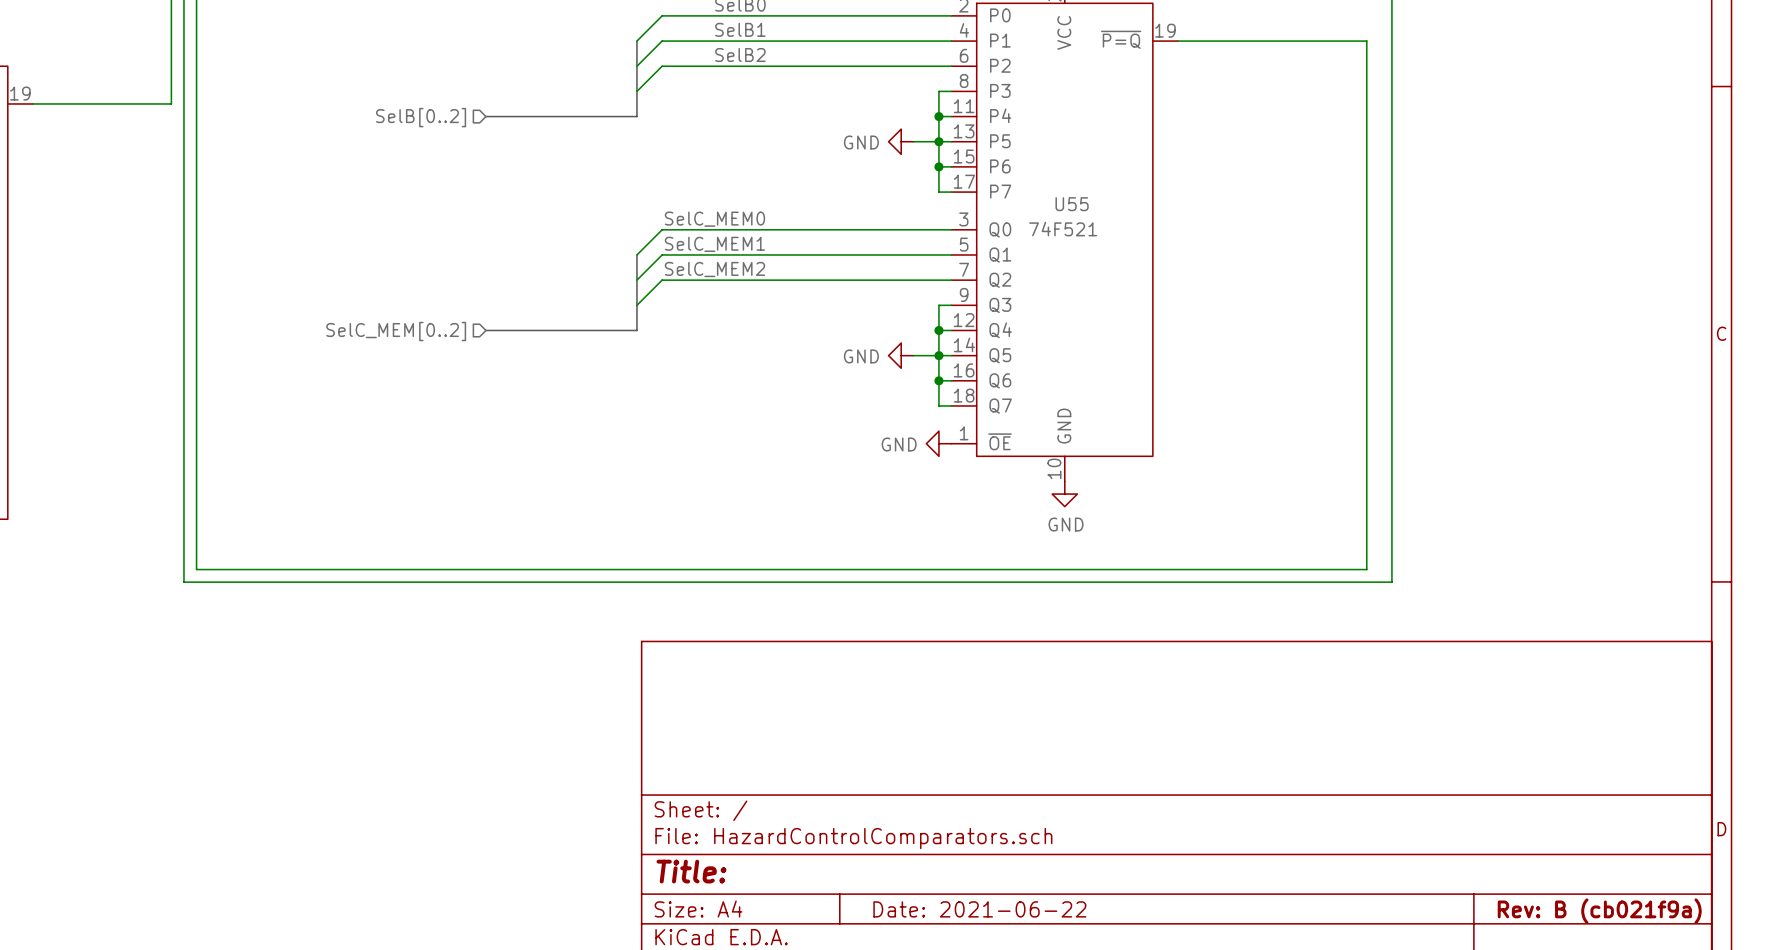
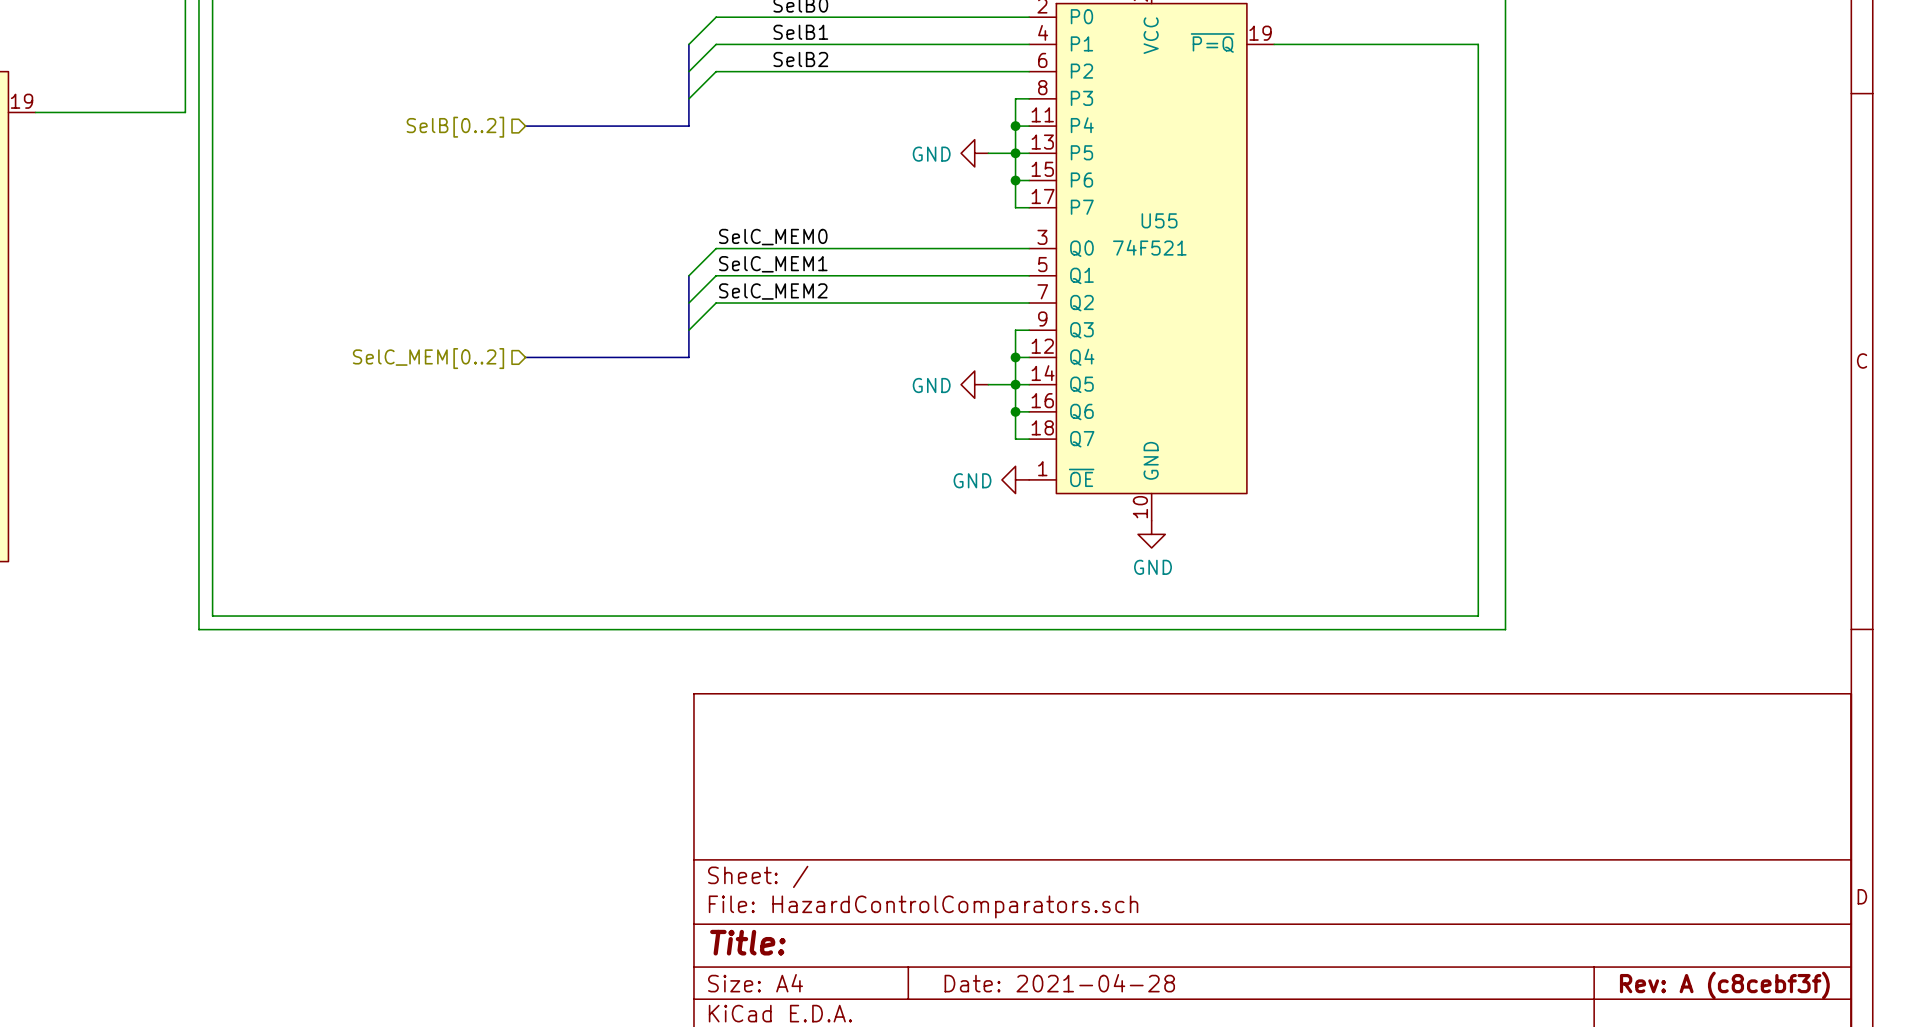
title block: Date: 2021-06-22 (979, 909) -> Date: 2021-04-28 (1059, 983)
title block: Rev: B (cb021f9a) (1599, 911) -> Rev: A (c8cebf3f) (1724, 985)

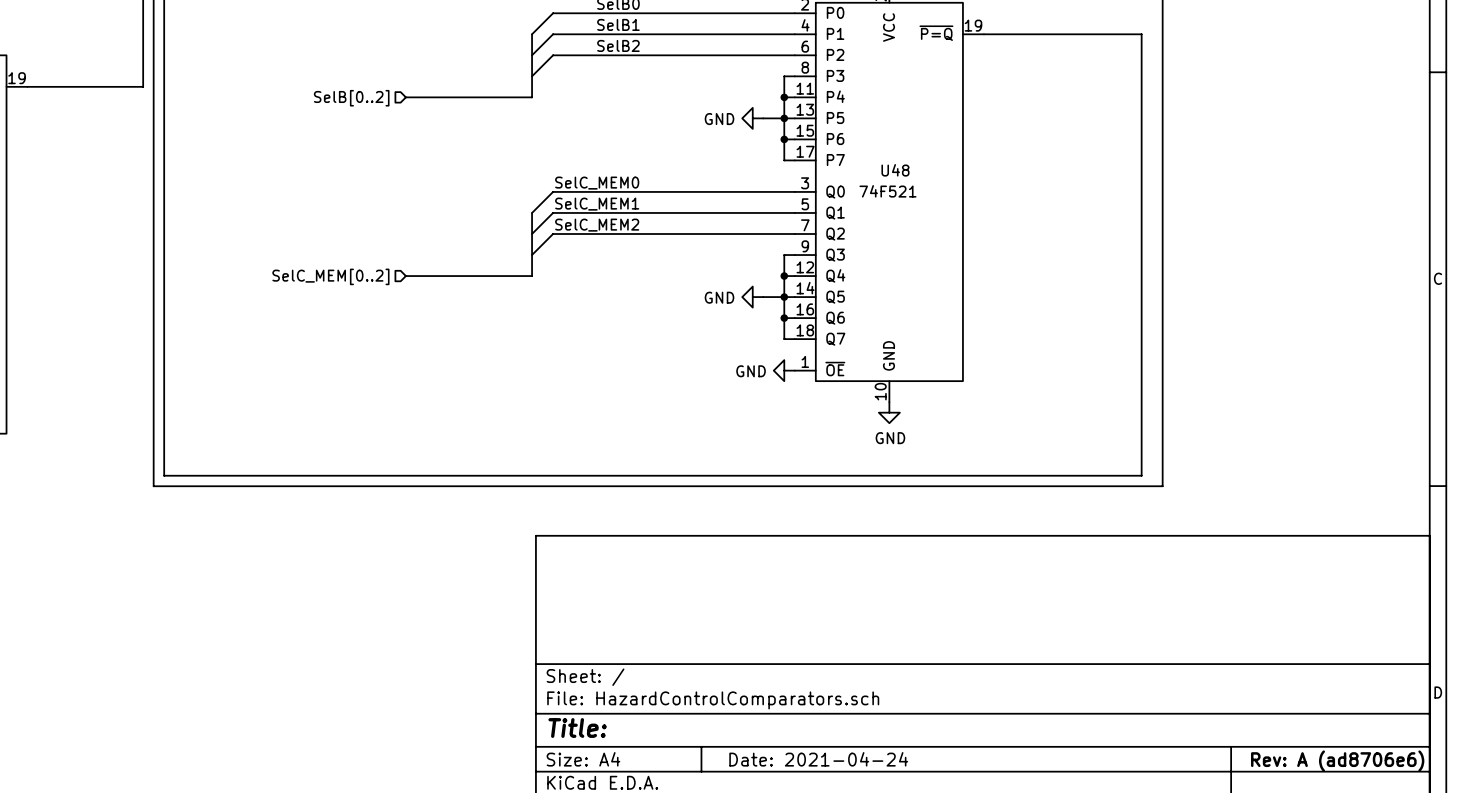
U55 name: U55 (1159, 220) -> U48 (895, 170)
title block: Date: 2021-04-28 (1059, 983) -> Date: 2021-04-24 (818, 759)
title block: Rev: A (c8cebf3f) (1724, 985) -> Rev: A (ad8706e6) (1337, 761)

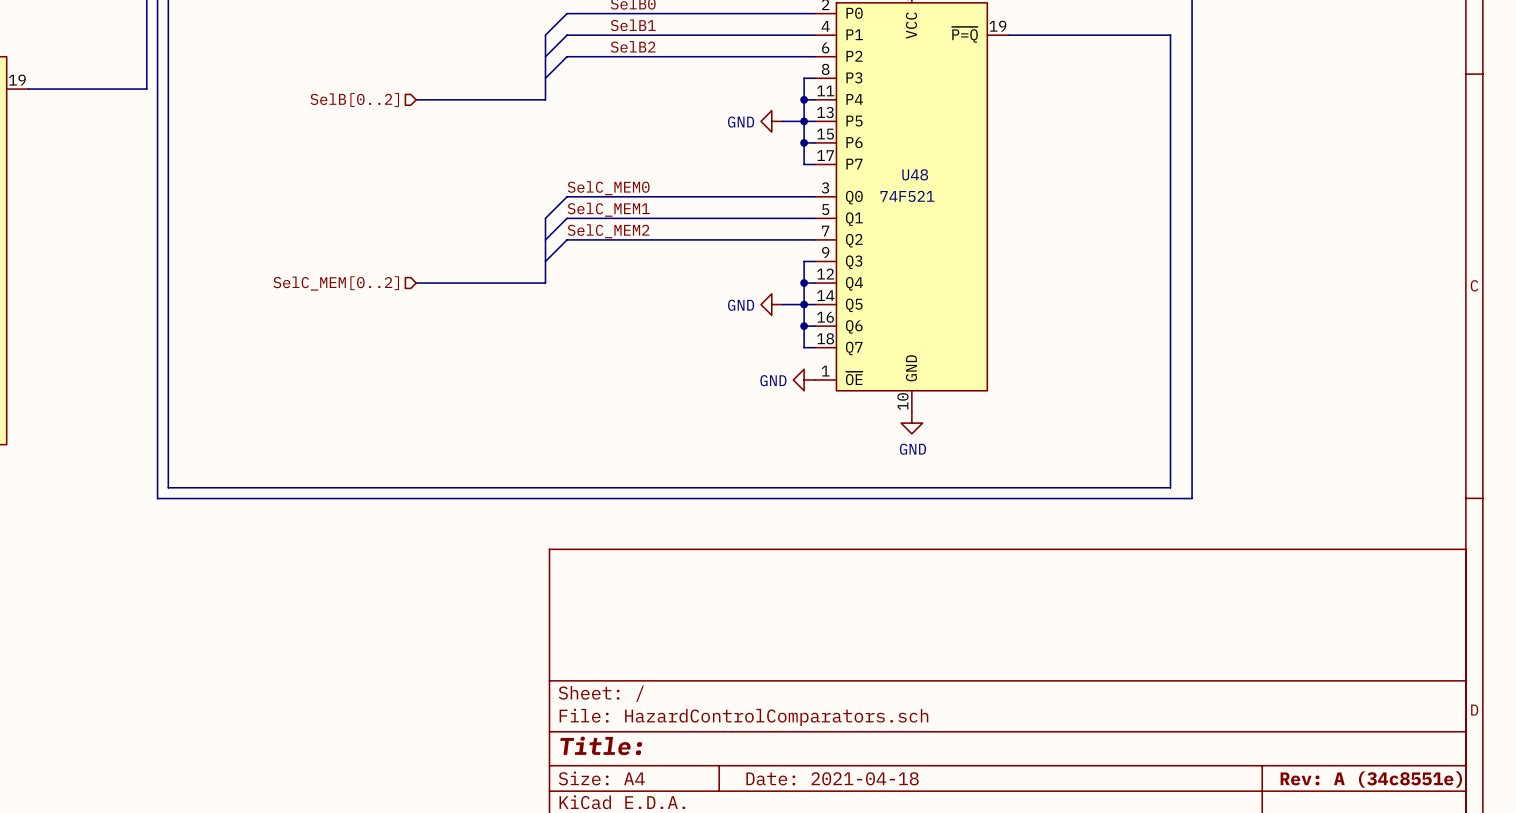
title block: Date: 2021-04-24 (818, 759) -> Date: 2021-04-18 (832, 778)
title block: Rev: A (ad8706e6) (1337, 761) -> Rev: A (34c8551e) (1371, 779)

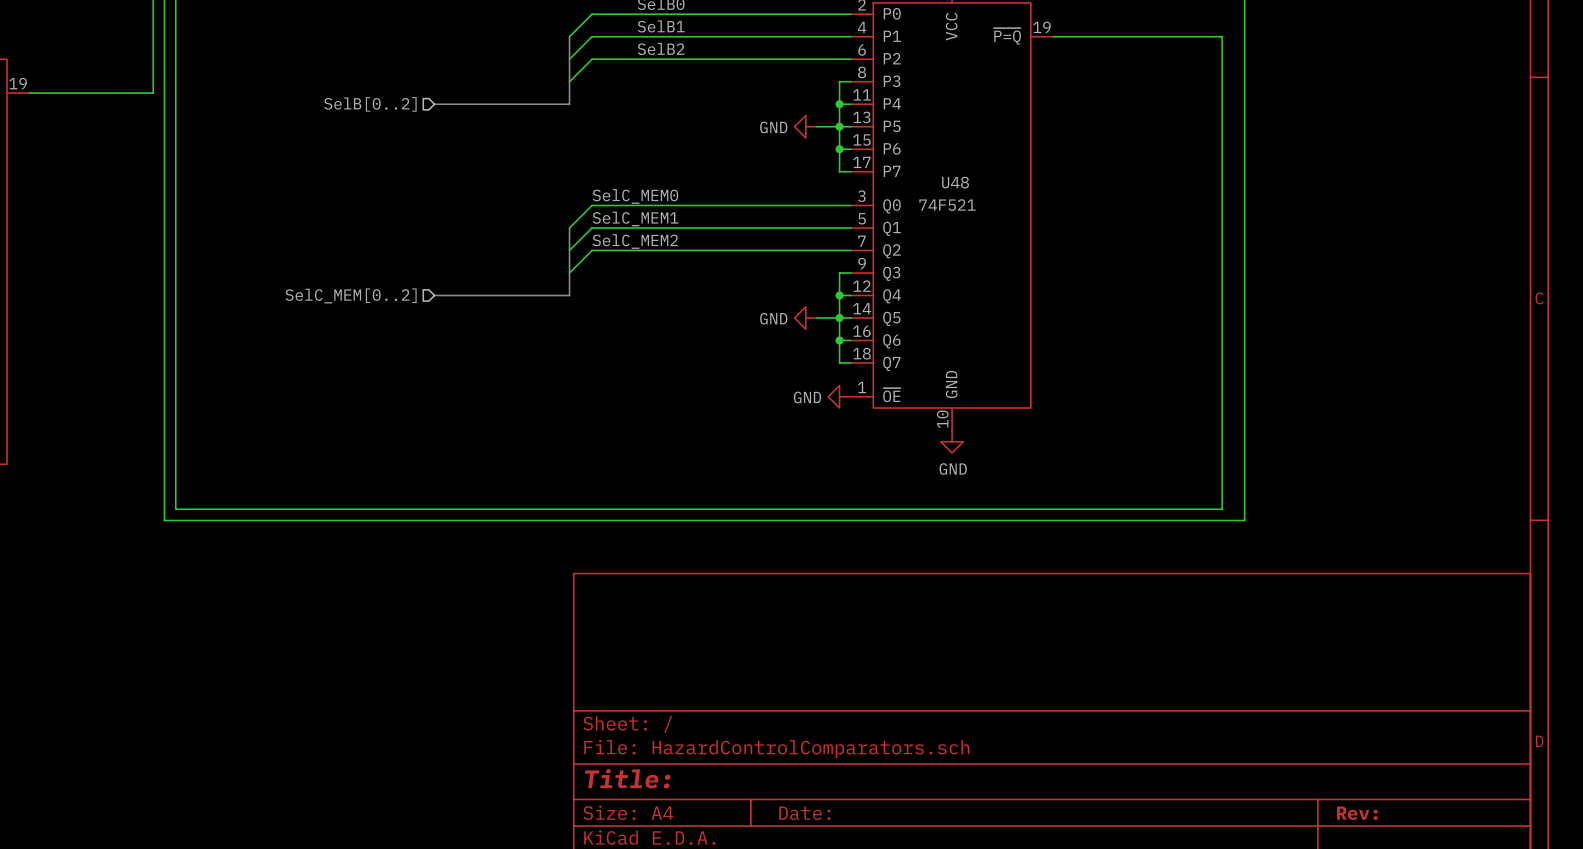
title block: Date: 2021-04-18 (832, 778) -> Date: (804, 813)
title block: Rev: A (34c8551e) (1371, 779) -> Rev: (1357, 813)

